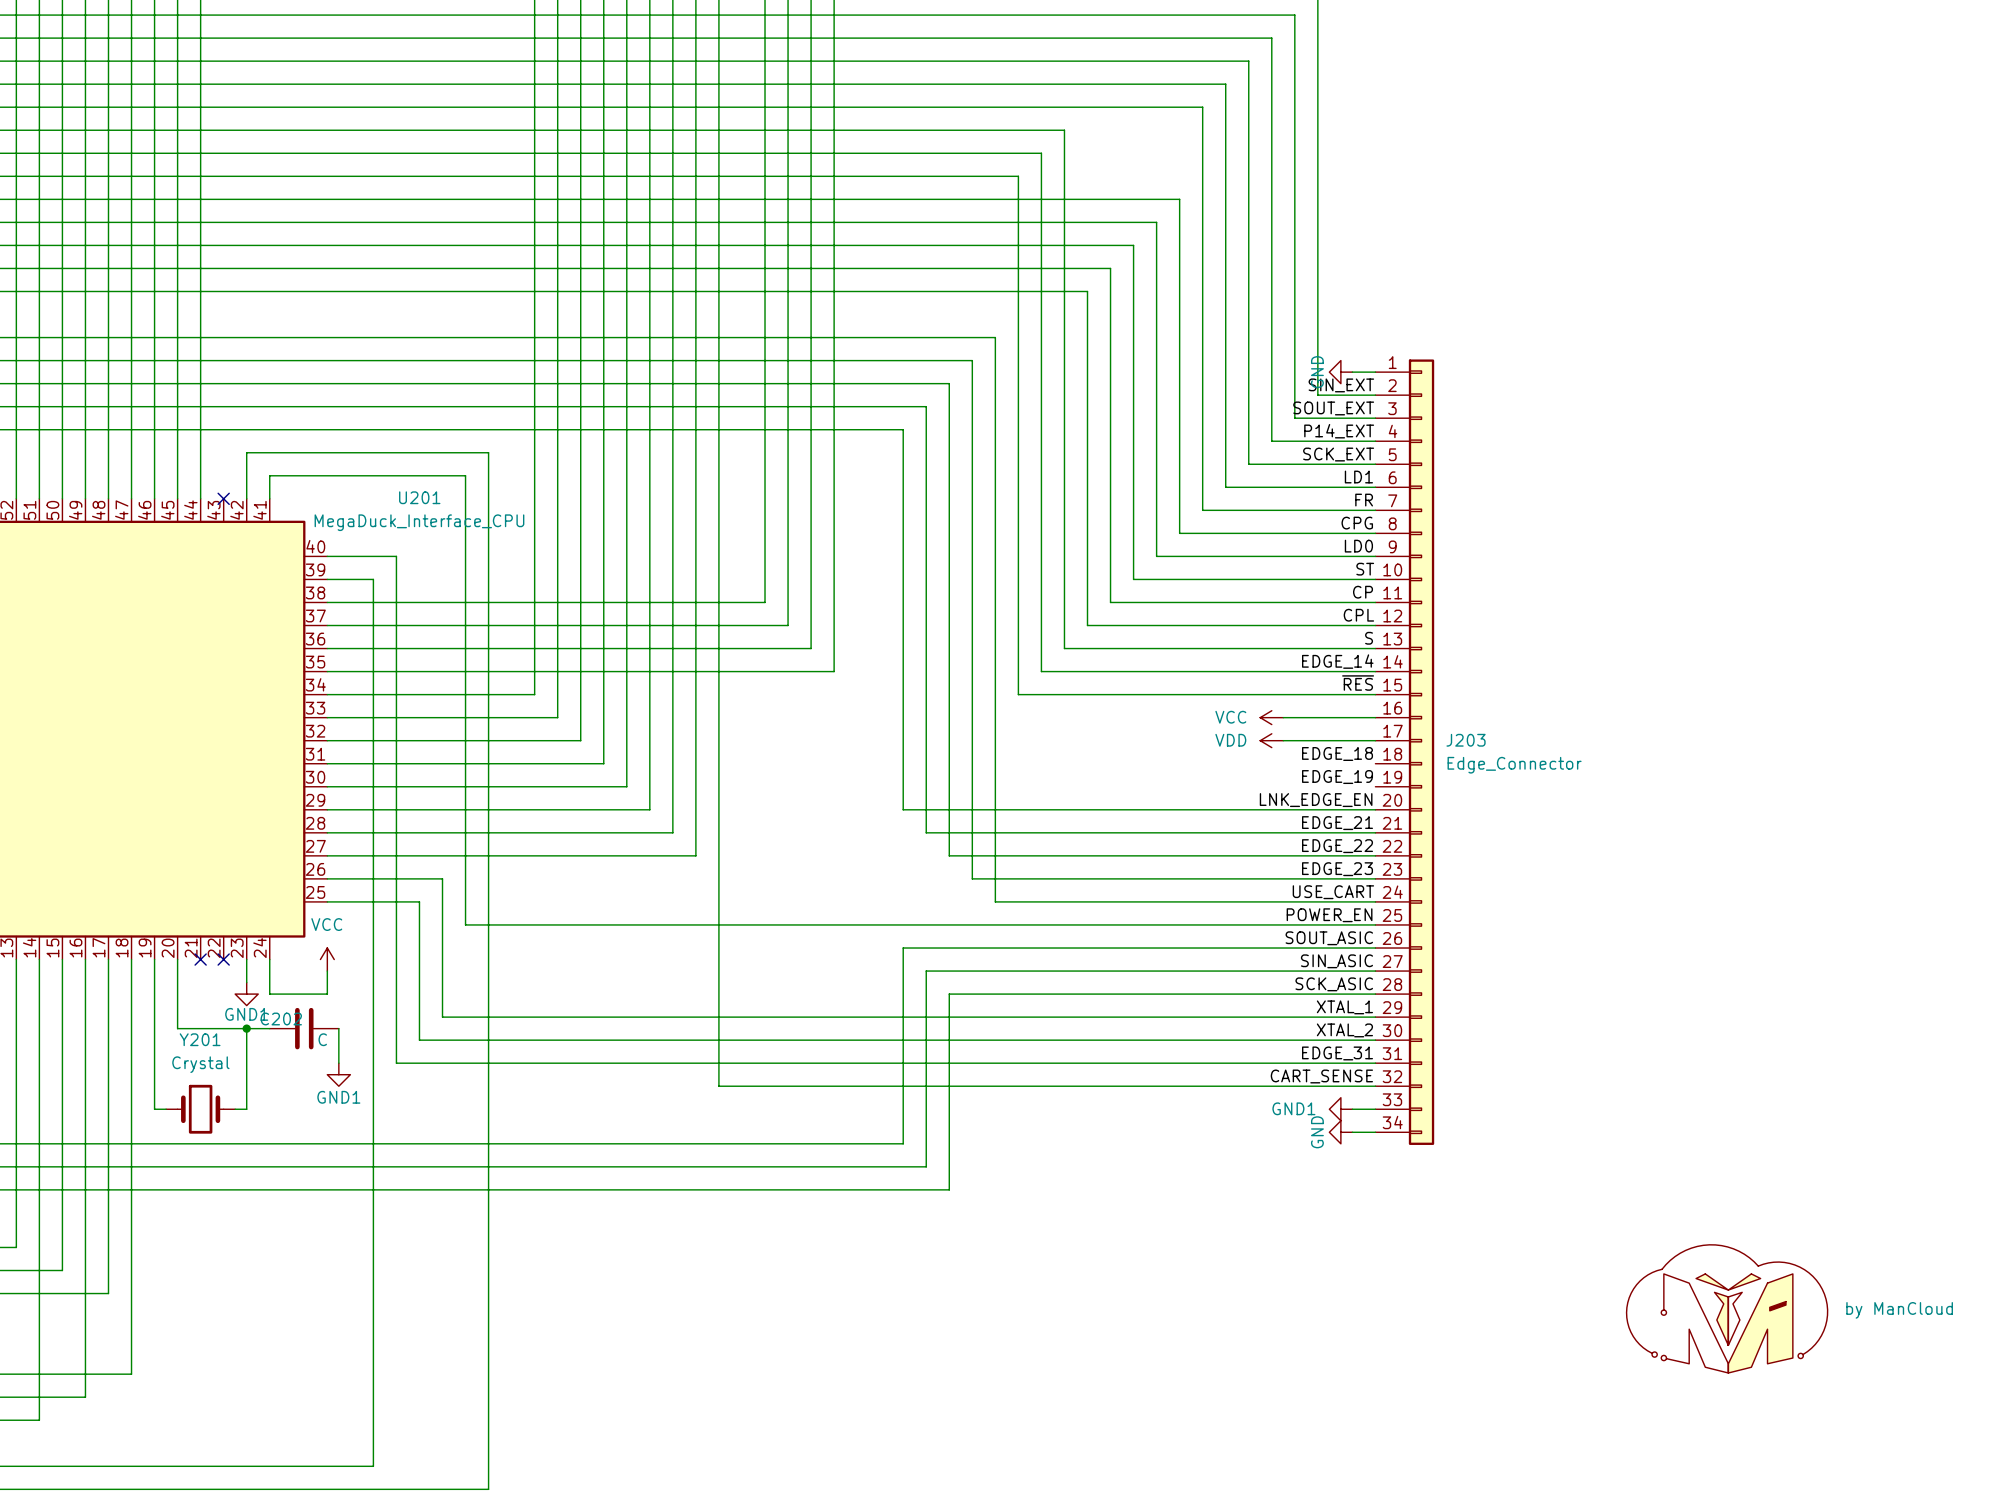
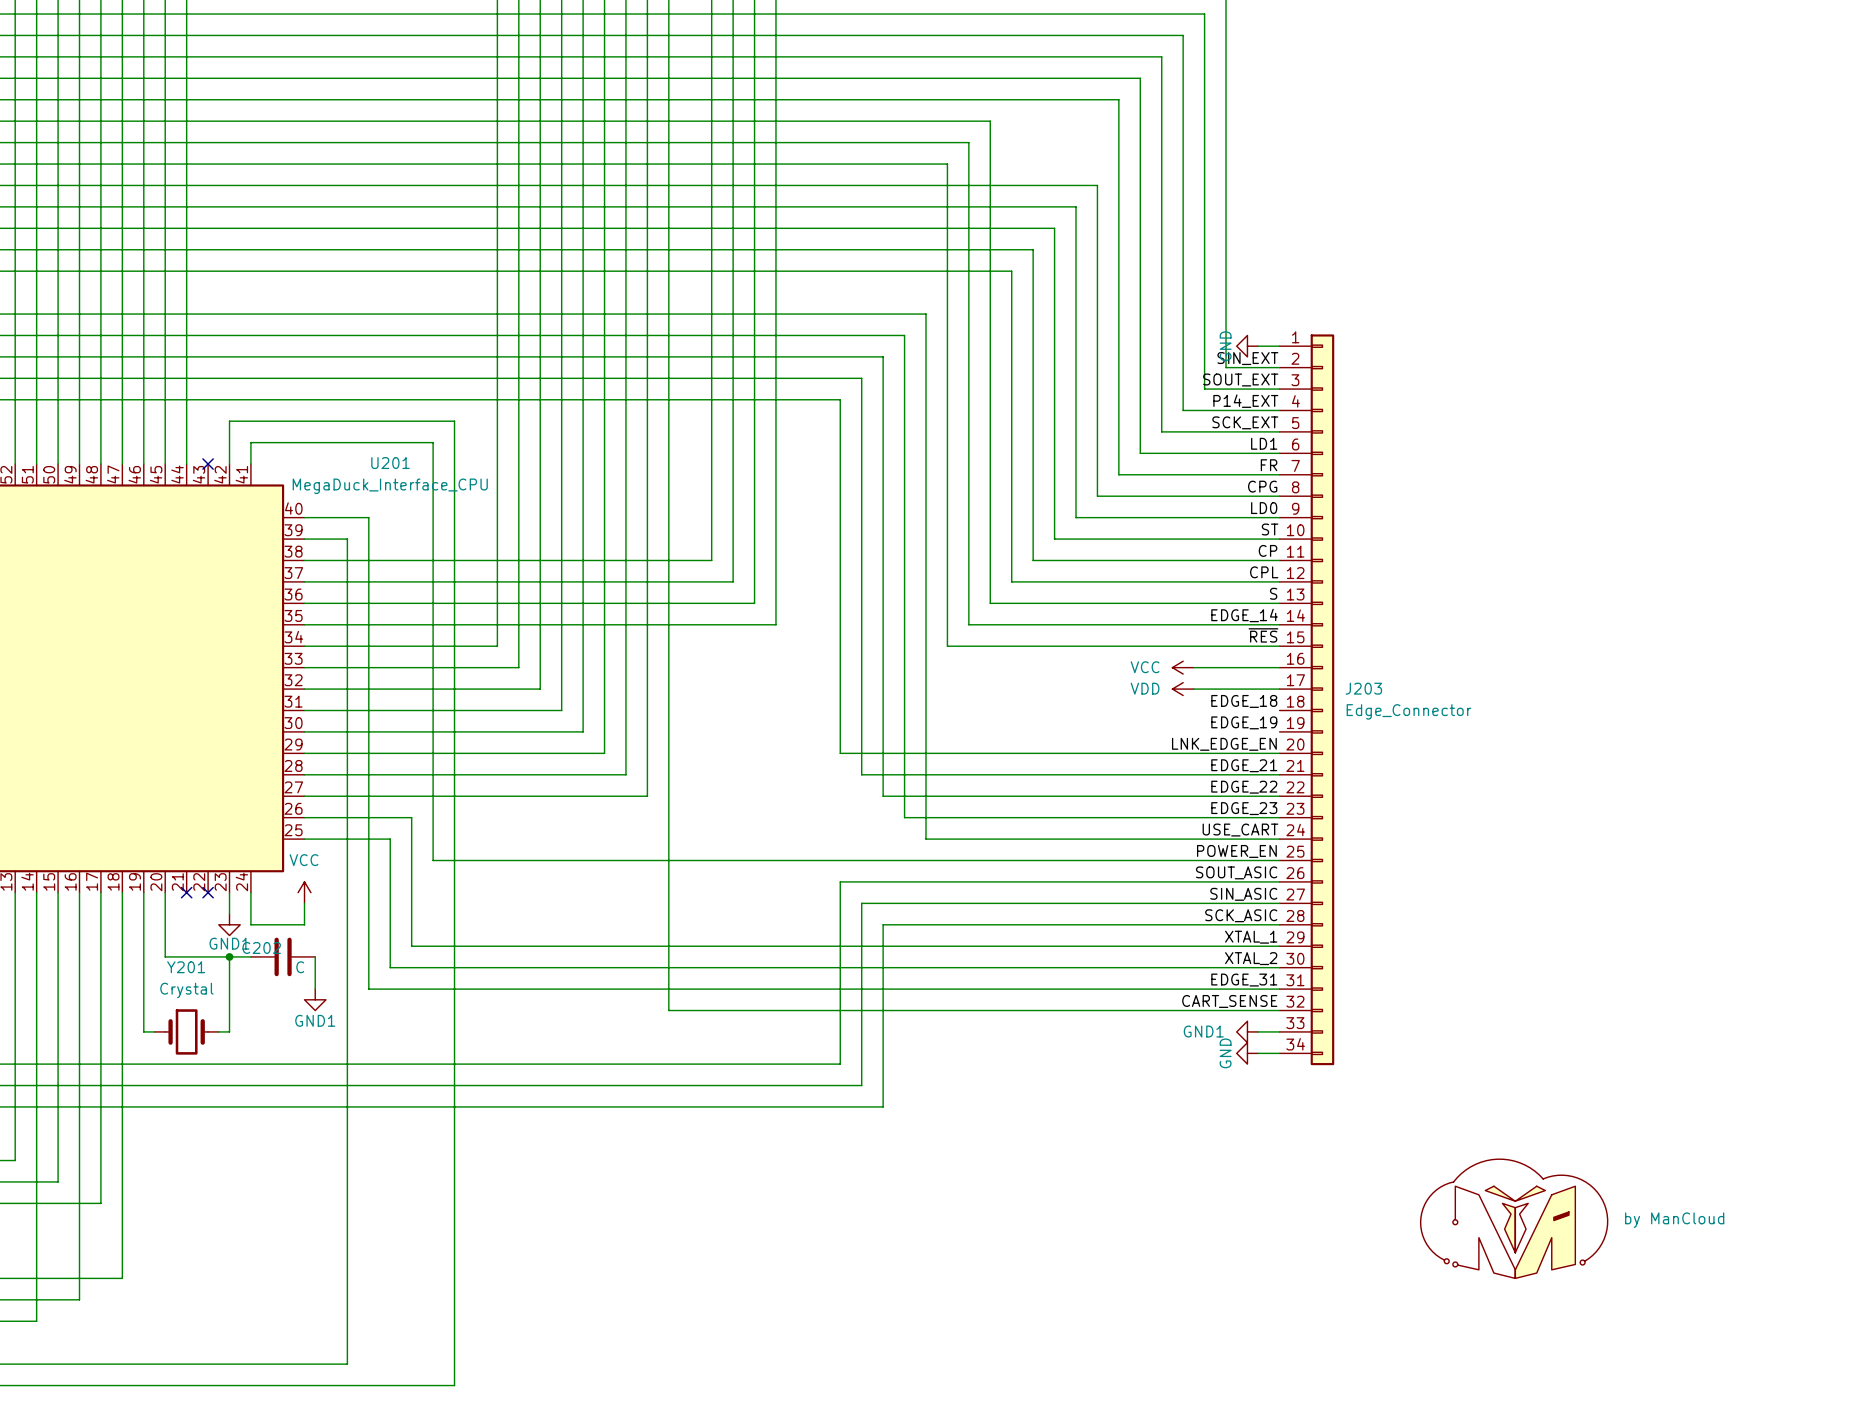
part position: (1727, 1308) -> (1514, 1218)

